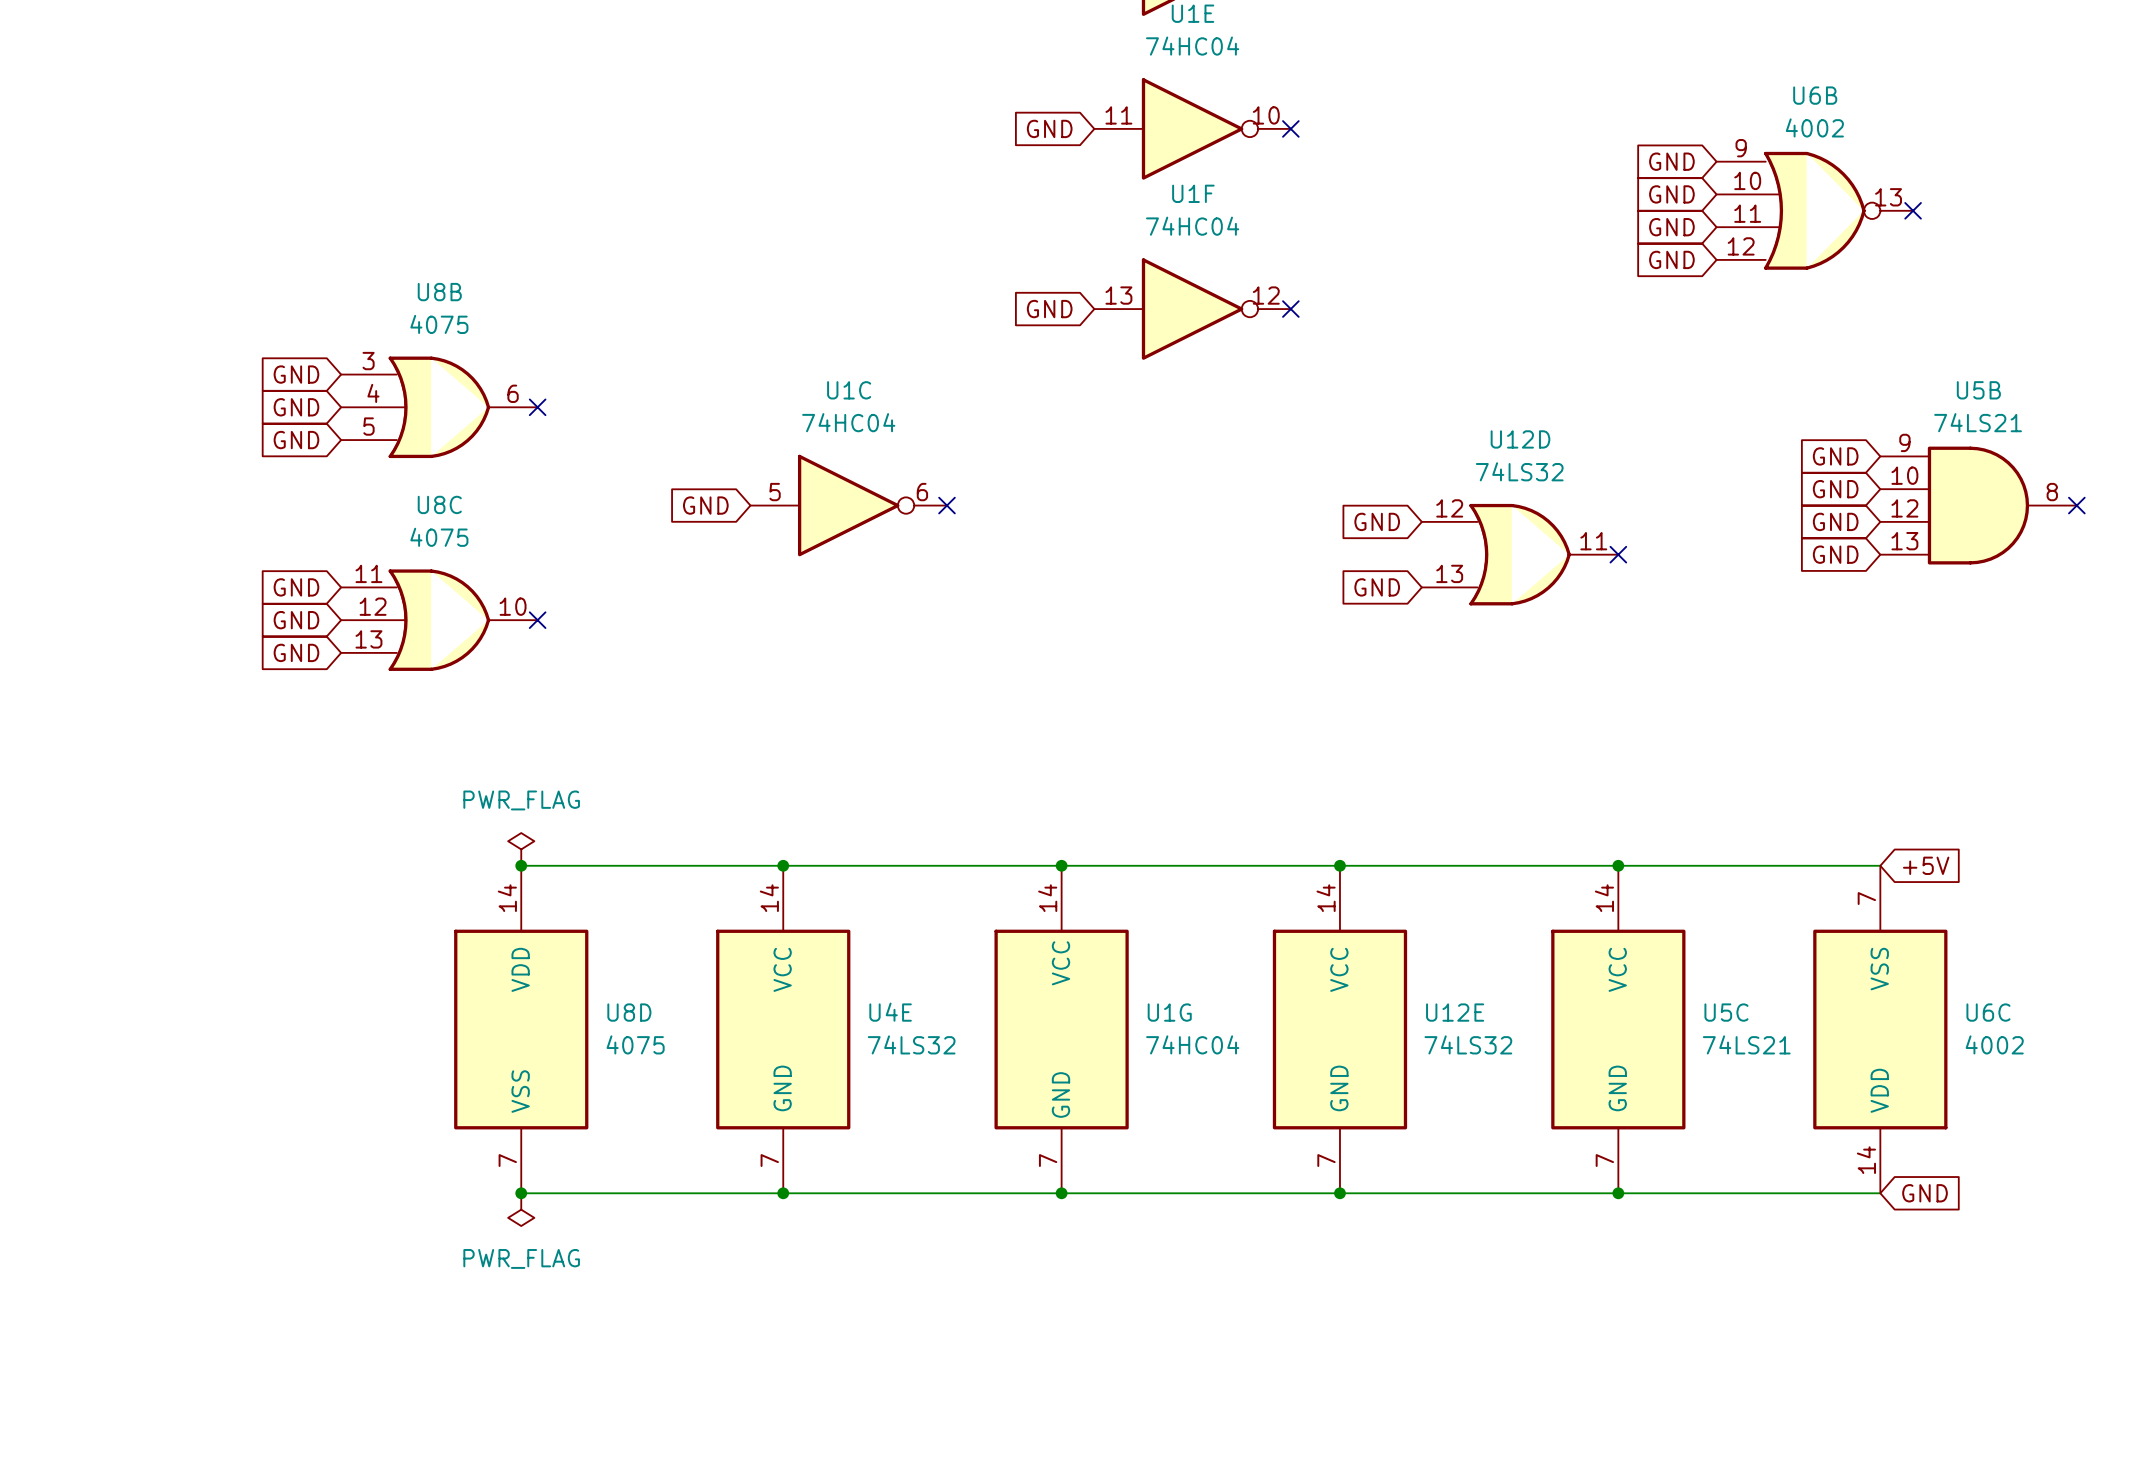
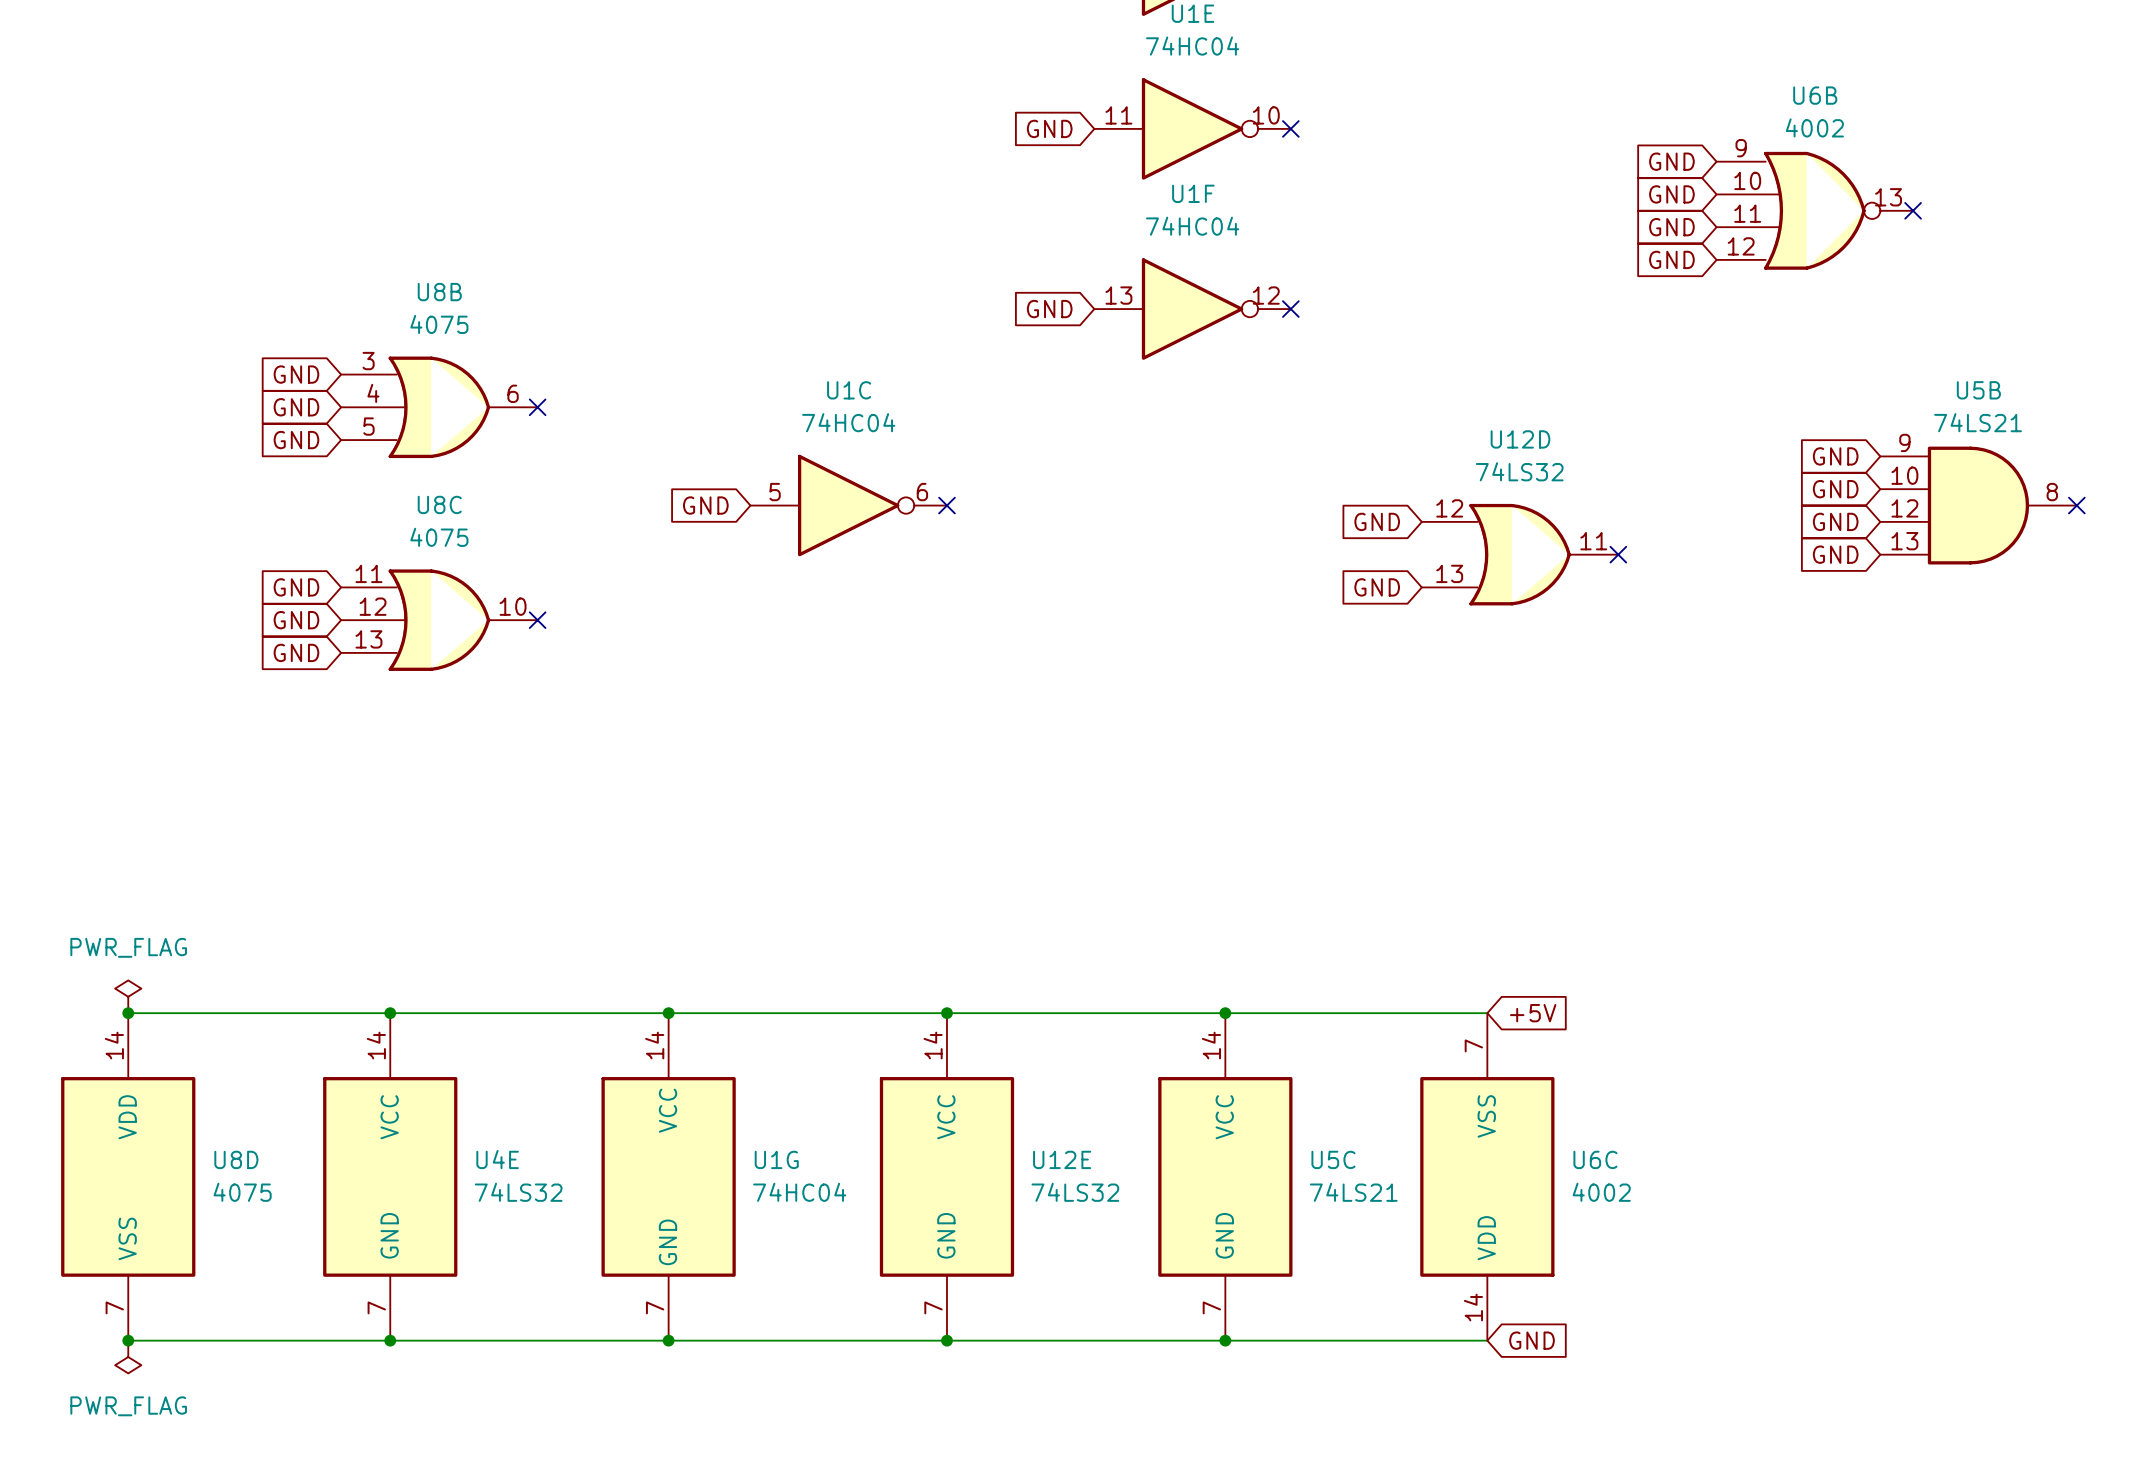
power symbol: PWR_FLAG (521, 849) -> none
wire: (521, 865) (1880, 865) -> none
junction: (521, 865) -> none
junction: (783, 865) -> none
junction: (1061, 865) -> none
junction: (1339, 865) -> none
junction: (1618, 865) -> none
global label: +5V (1926, 865) -> none
power symbol: none -> PWR_FLAG (128, 996)
wire: none -> (128, 1013) (1487, 1013)
junction: none -> (128, 1013)
junction: none -> (390, 1013)
junction: none -> (668, 1013)
junction: none -> (946, 1013)
junction: none -> (1225, 1013)
global label: none -> +5V (1533, 1013)
U8D position: (521, 1029) -> (128, 1176)
U4E position: (783, 1029) -> (390, 1176)
U1G position: (1061, 1029) -> (668, 1176)
U12E position: (1339, 1029) -> (946, 1176)
U5C position: (1618, 1029) -> (1225, 1176)
U6C position: (1880, 1029) -> (1487, 1176)
wire: (521, 1193) (1880, 1193) -> none
junction: (521, 1193) -> none
junction: (783, 1193) -> none
junction: (1061, 1193) -> none
junction: (1339, 1193) -> none
junction: (1618, 1193) -> none
global label: GND (1925, 1193) -> none
power symbol: PWR_FLAG (521, 1209) -> none
wire: none -> (128, 1340) (1487, 1340)
junction: none -> (128, 1340)
junction: none -> (390, 1340)
junction: none -> (668, 1340)
junction: none -> (946, 1340)
junction: none -> (1225, 1340)
global label: none -> GND (1532, 1340)
power symbol: none -> PWR_FLAG (128, 1357)

